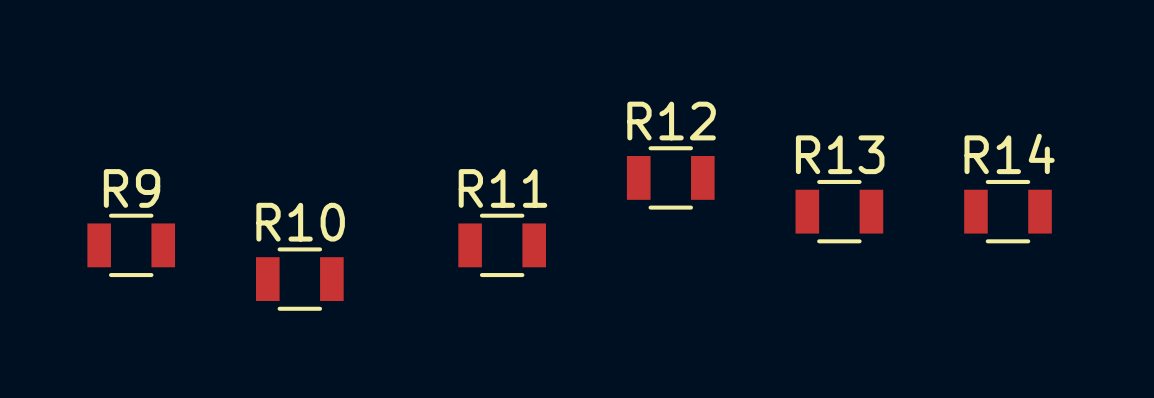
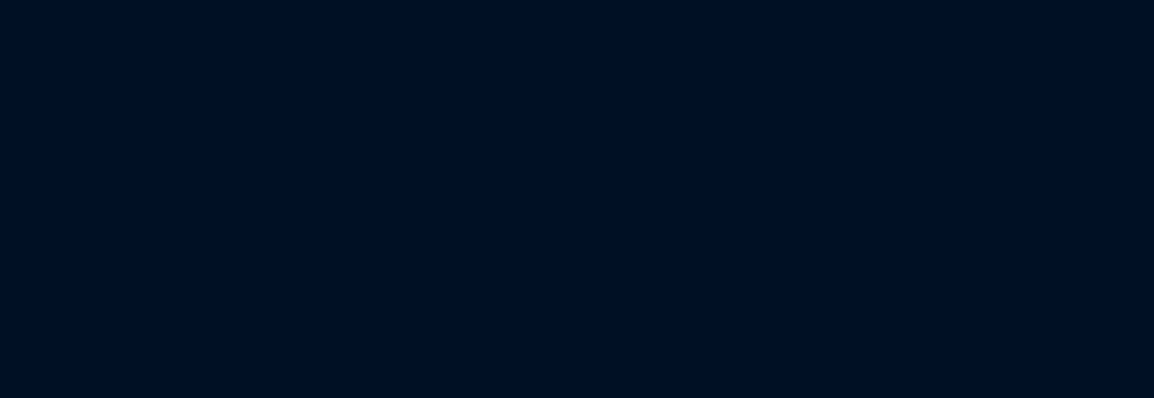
R12: (670, 177) -> none
R13: (839, 211) -> none
R14: (1007, 211) -> none
R9: (131, 245) -> none
R11: (502, 245) -> none
R10: (299, 279) -> none

